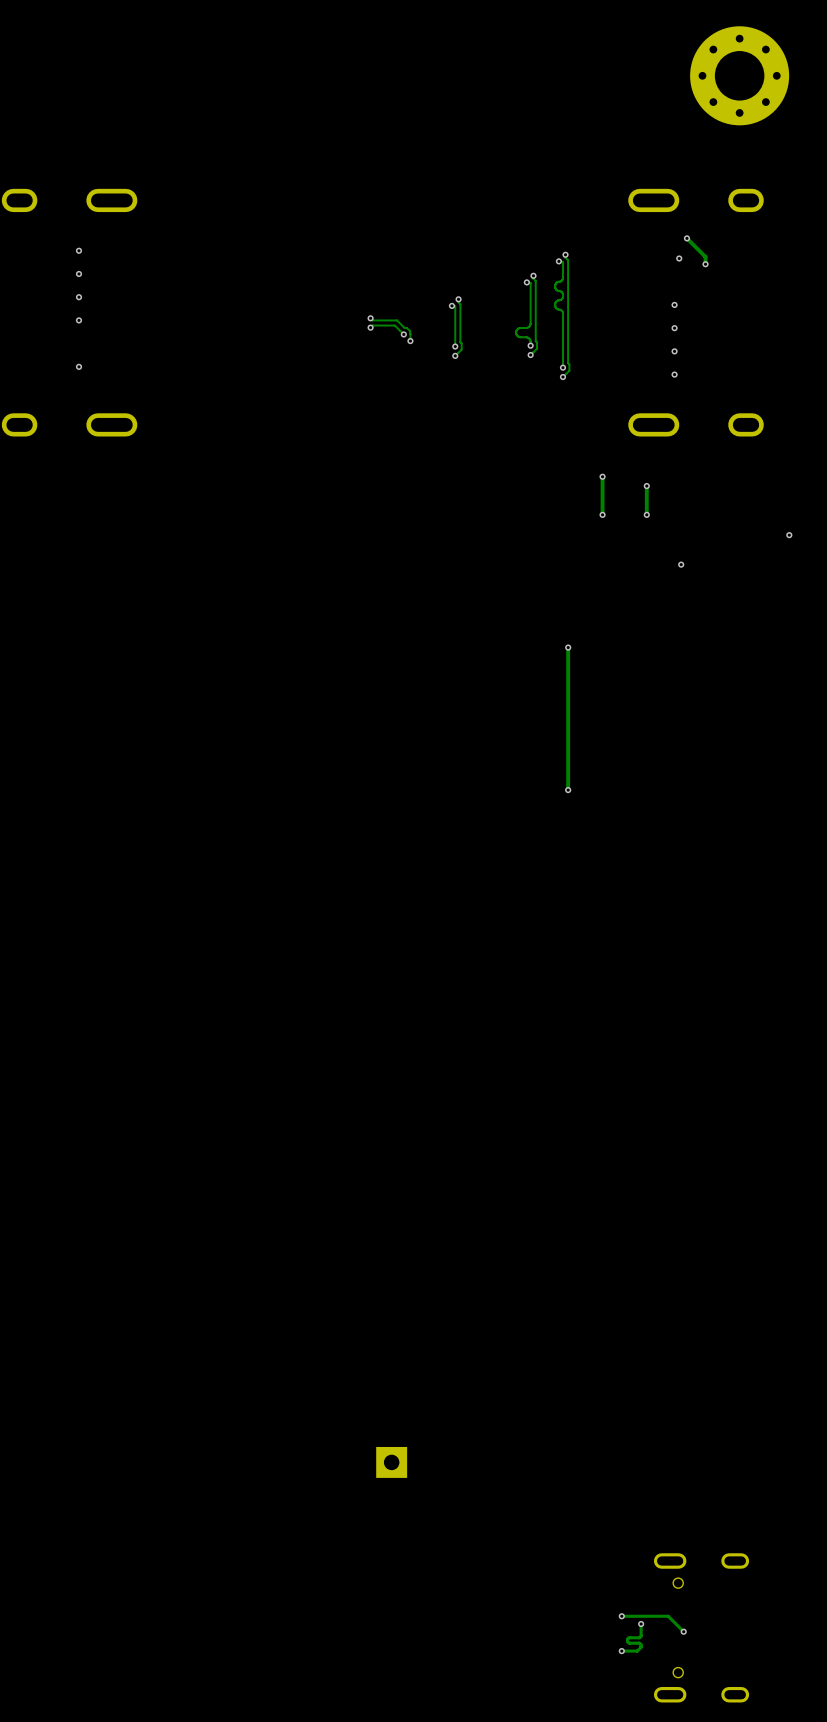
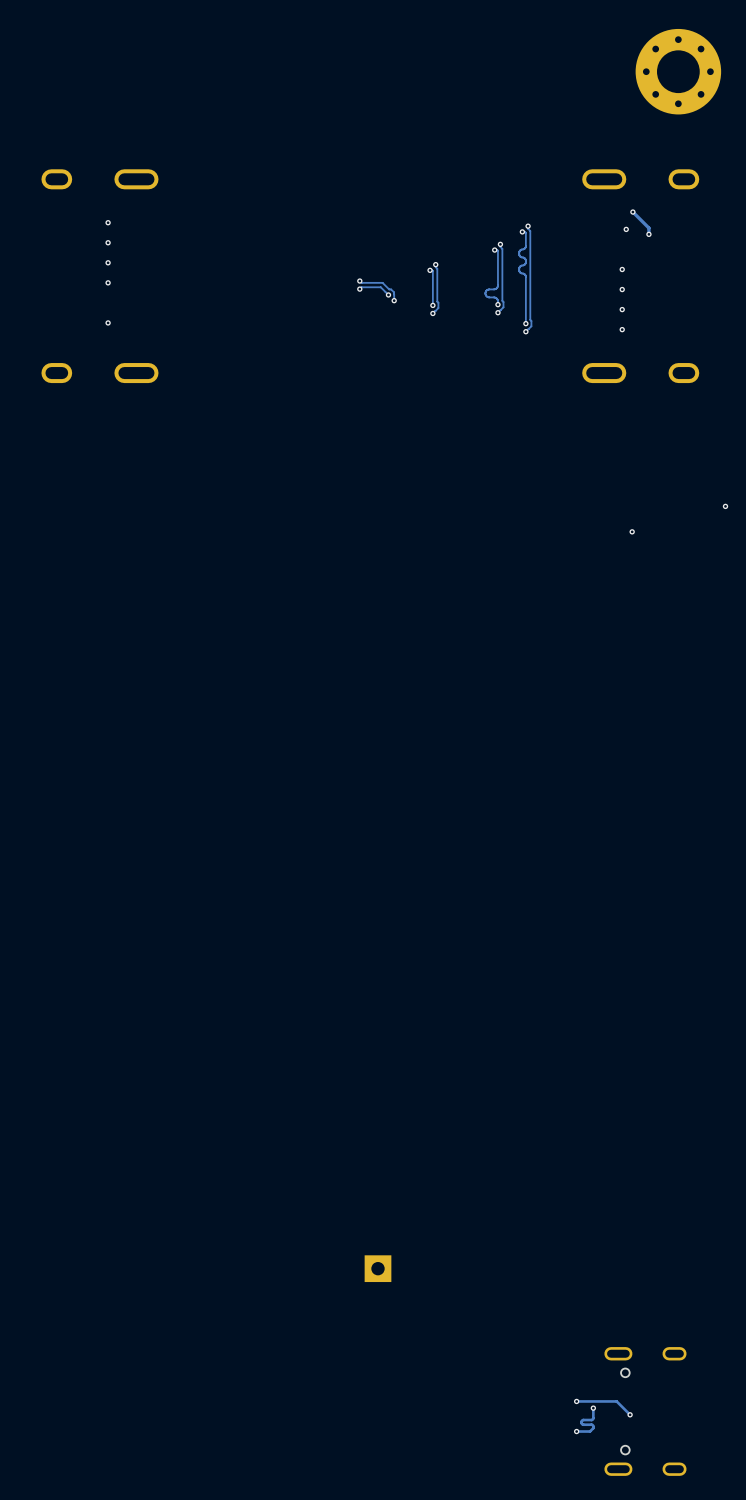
track: (602, 476) (602, 514) -> none
via: (602, 476) -> none
track: (646, 486) (646, 514) -> none
via: (646, 486) -> none
via: (602, 514) -> none
via: (646, 514) -> none
via position: (789, 535) -> (725, 506)
via position: (681, 564) -> (632, 531)
track: (568, 647) (568, 790) -> none
via: (568, 647) -> none
via: (568, 790) -> none

